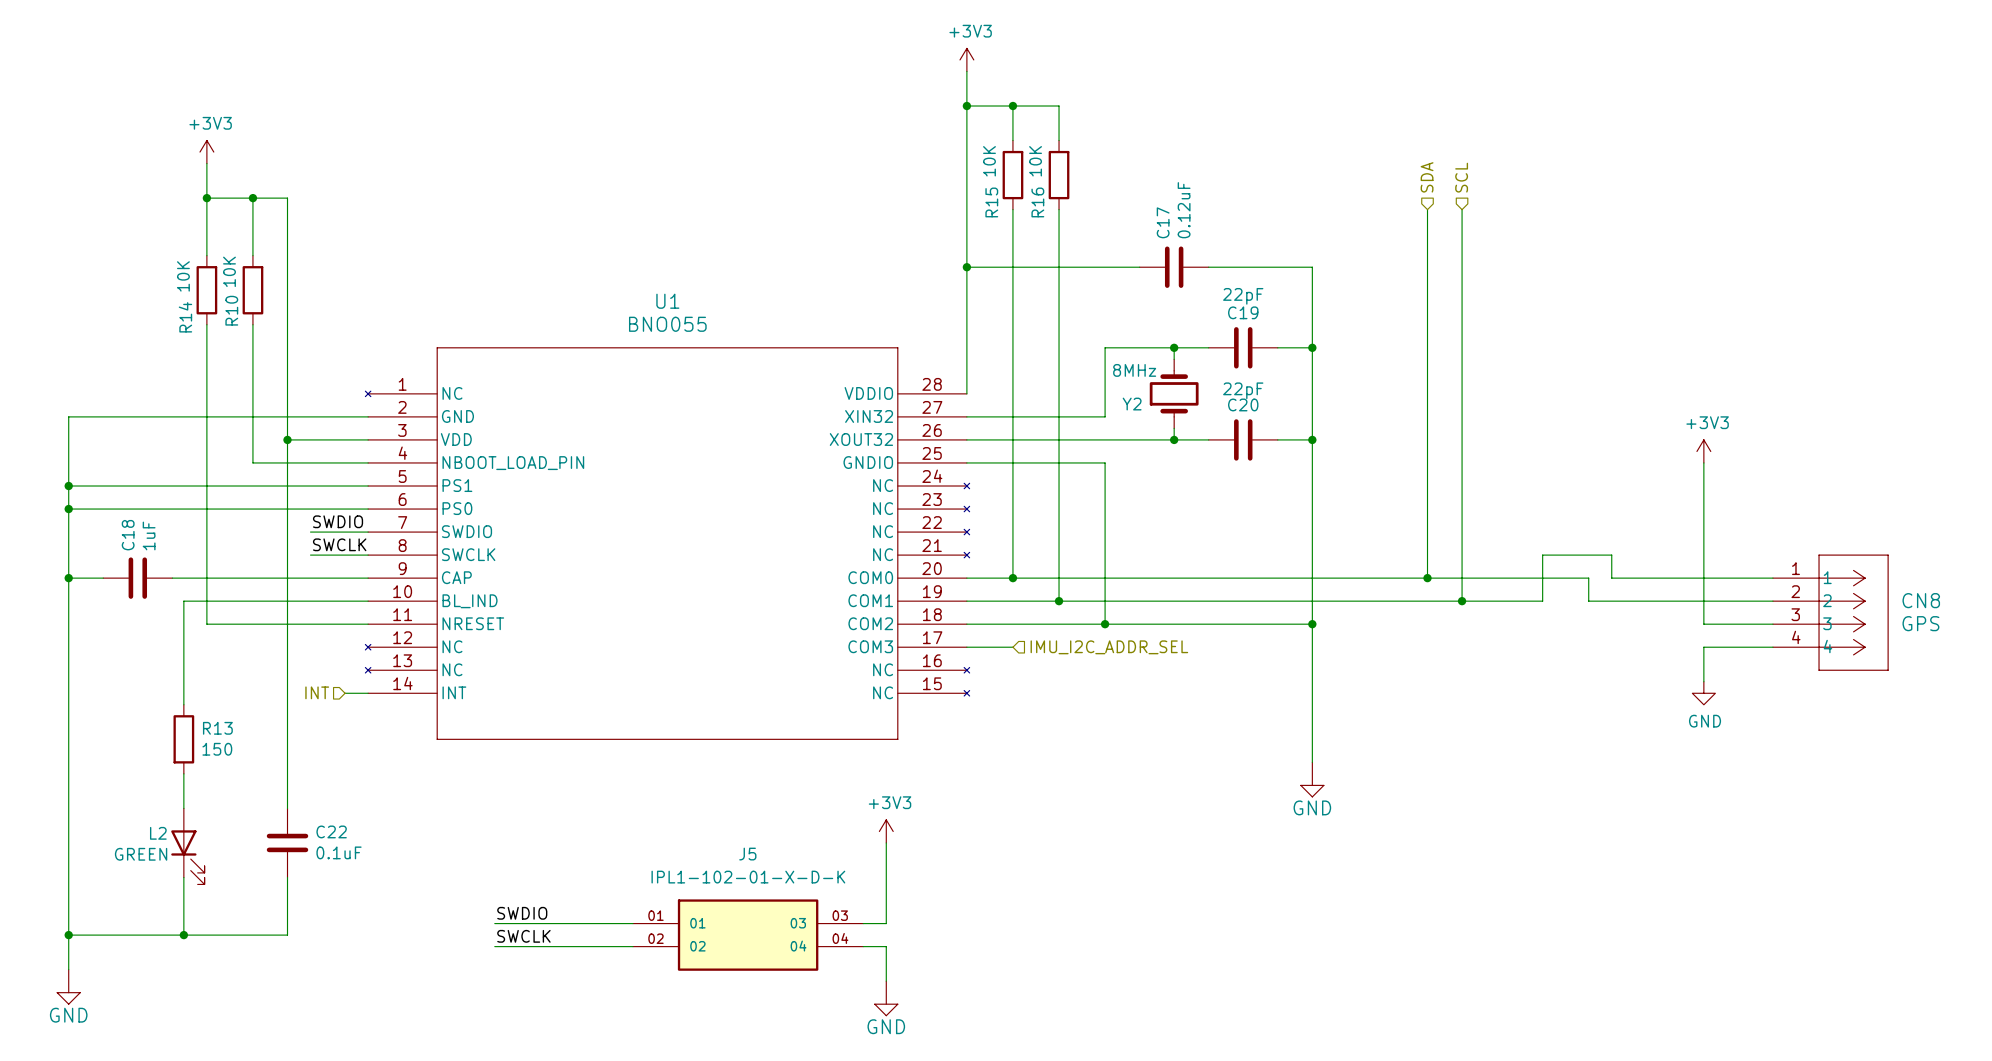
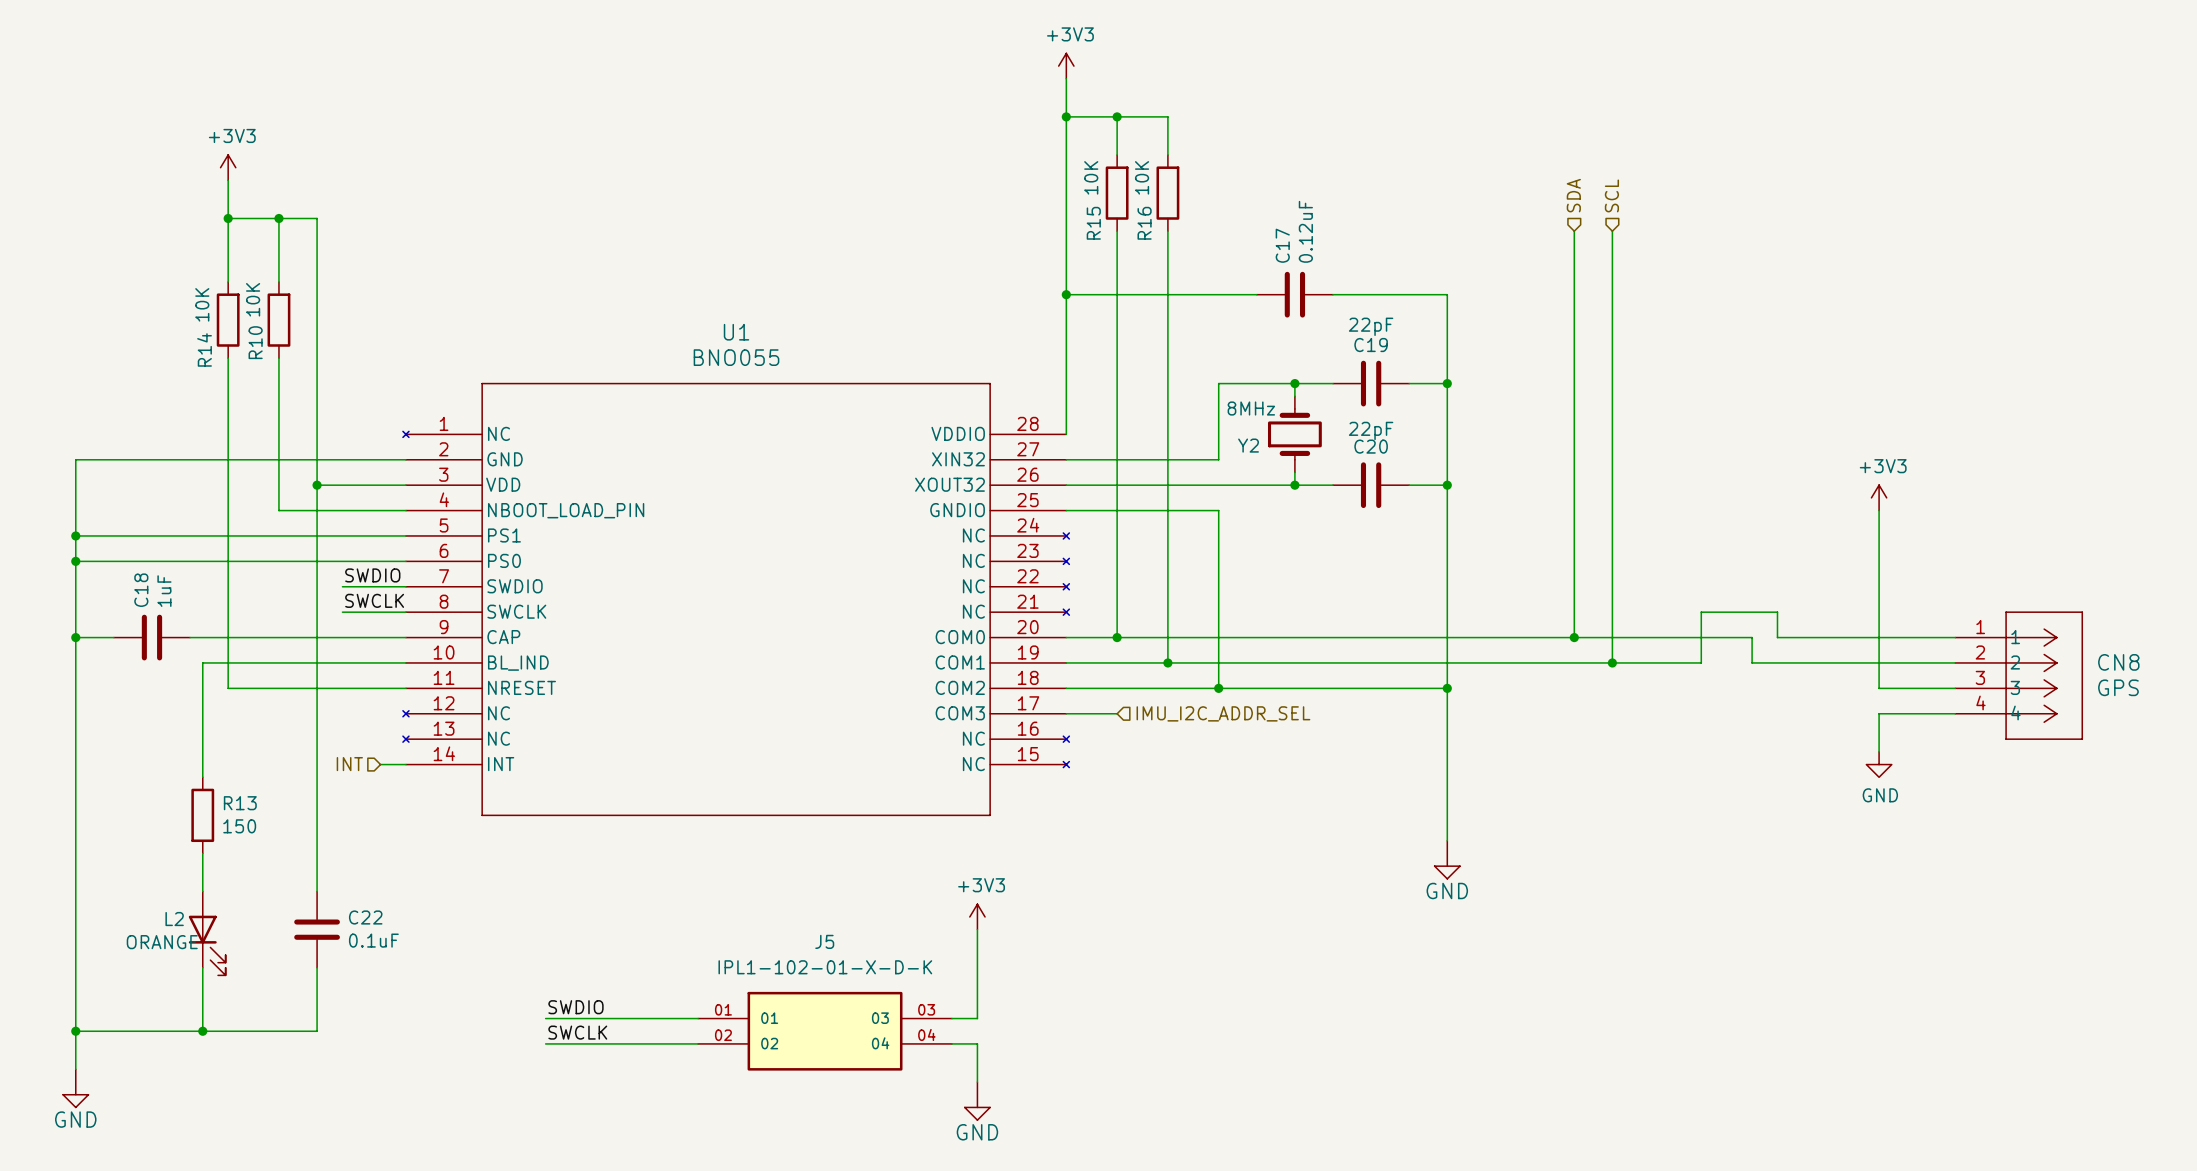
L2 value: GREEN (141, 854) -> ORANGE (162, 942)

